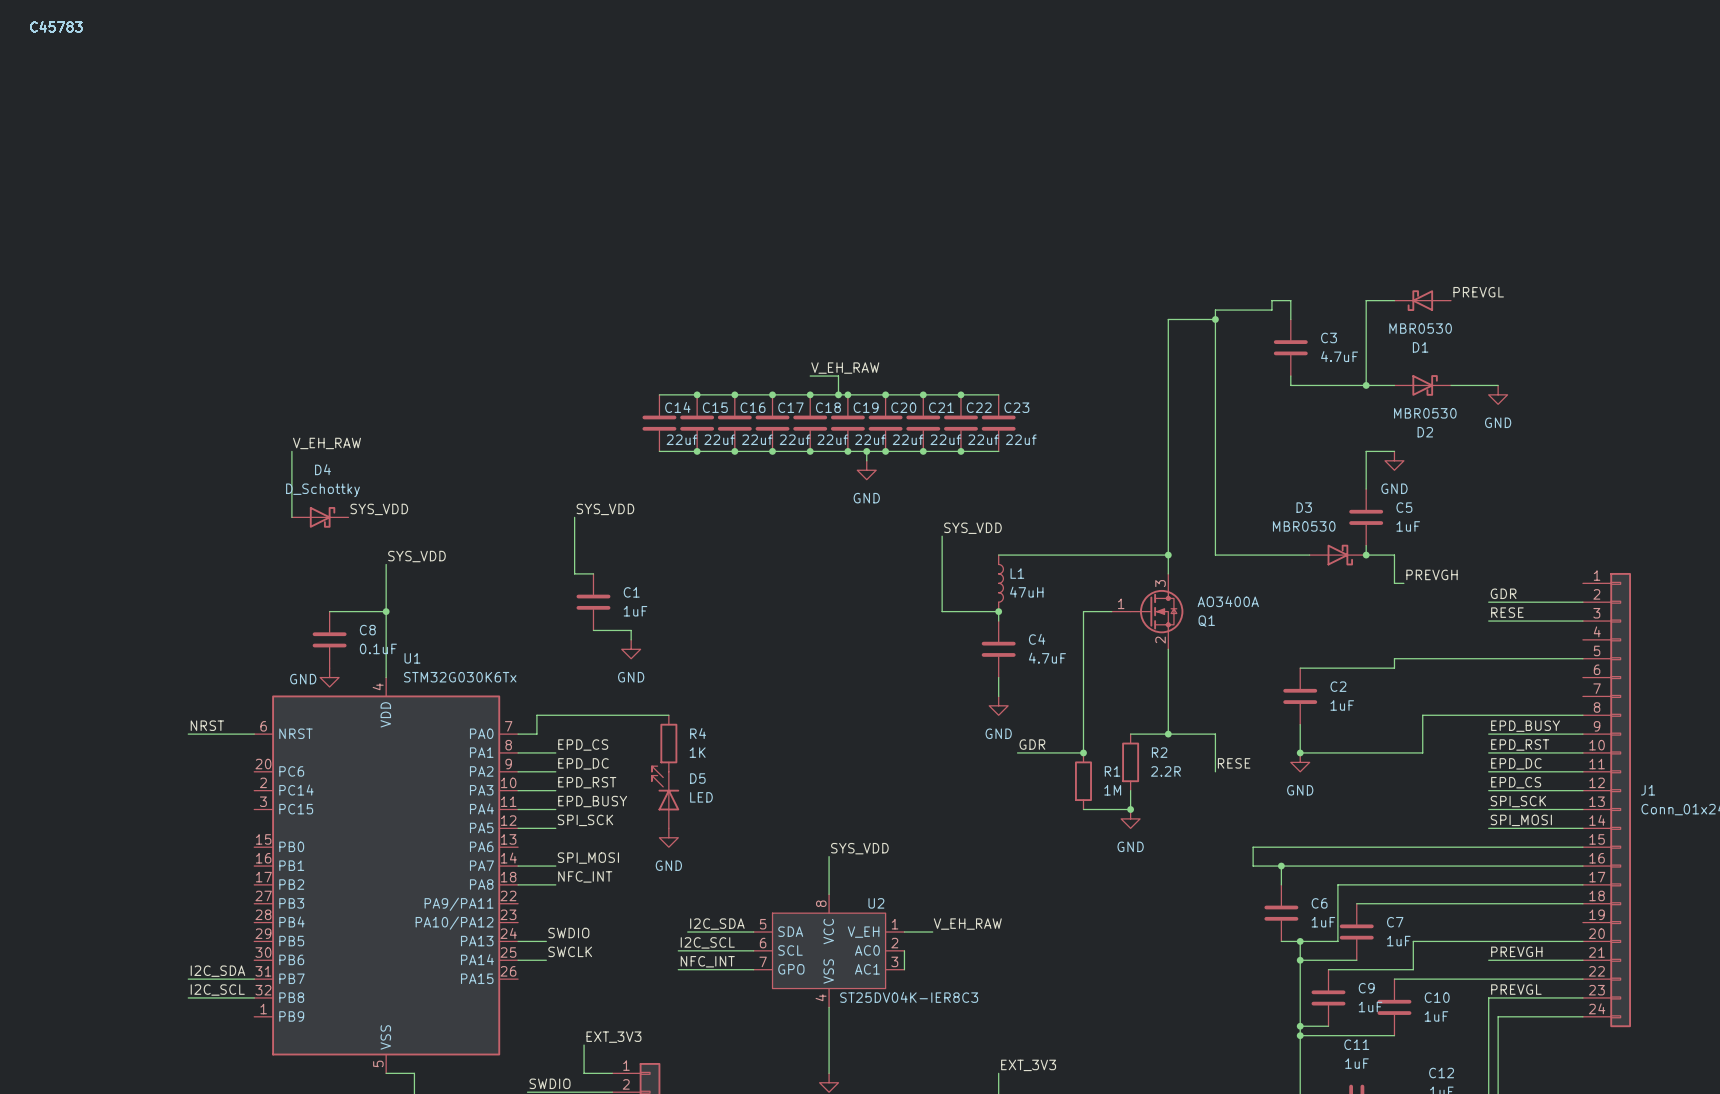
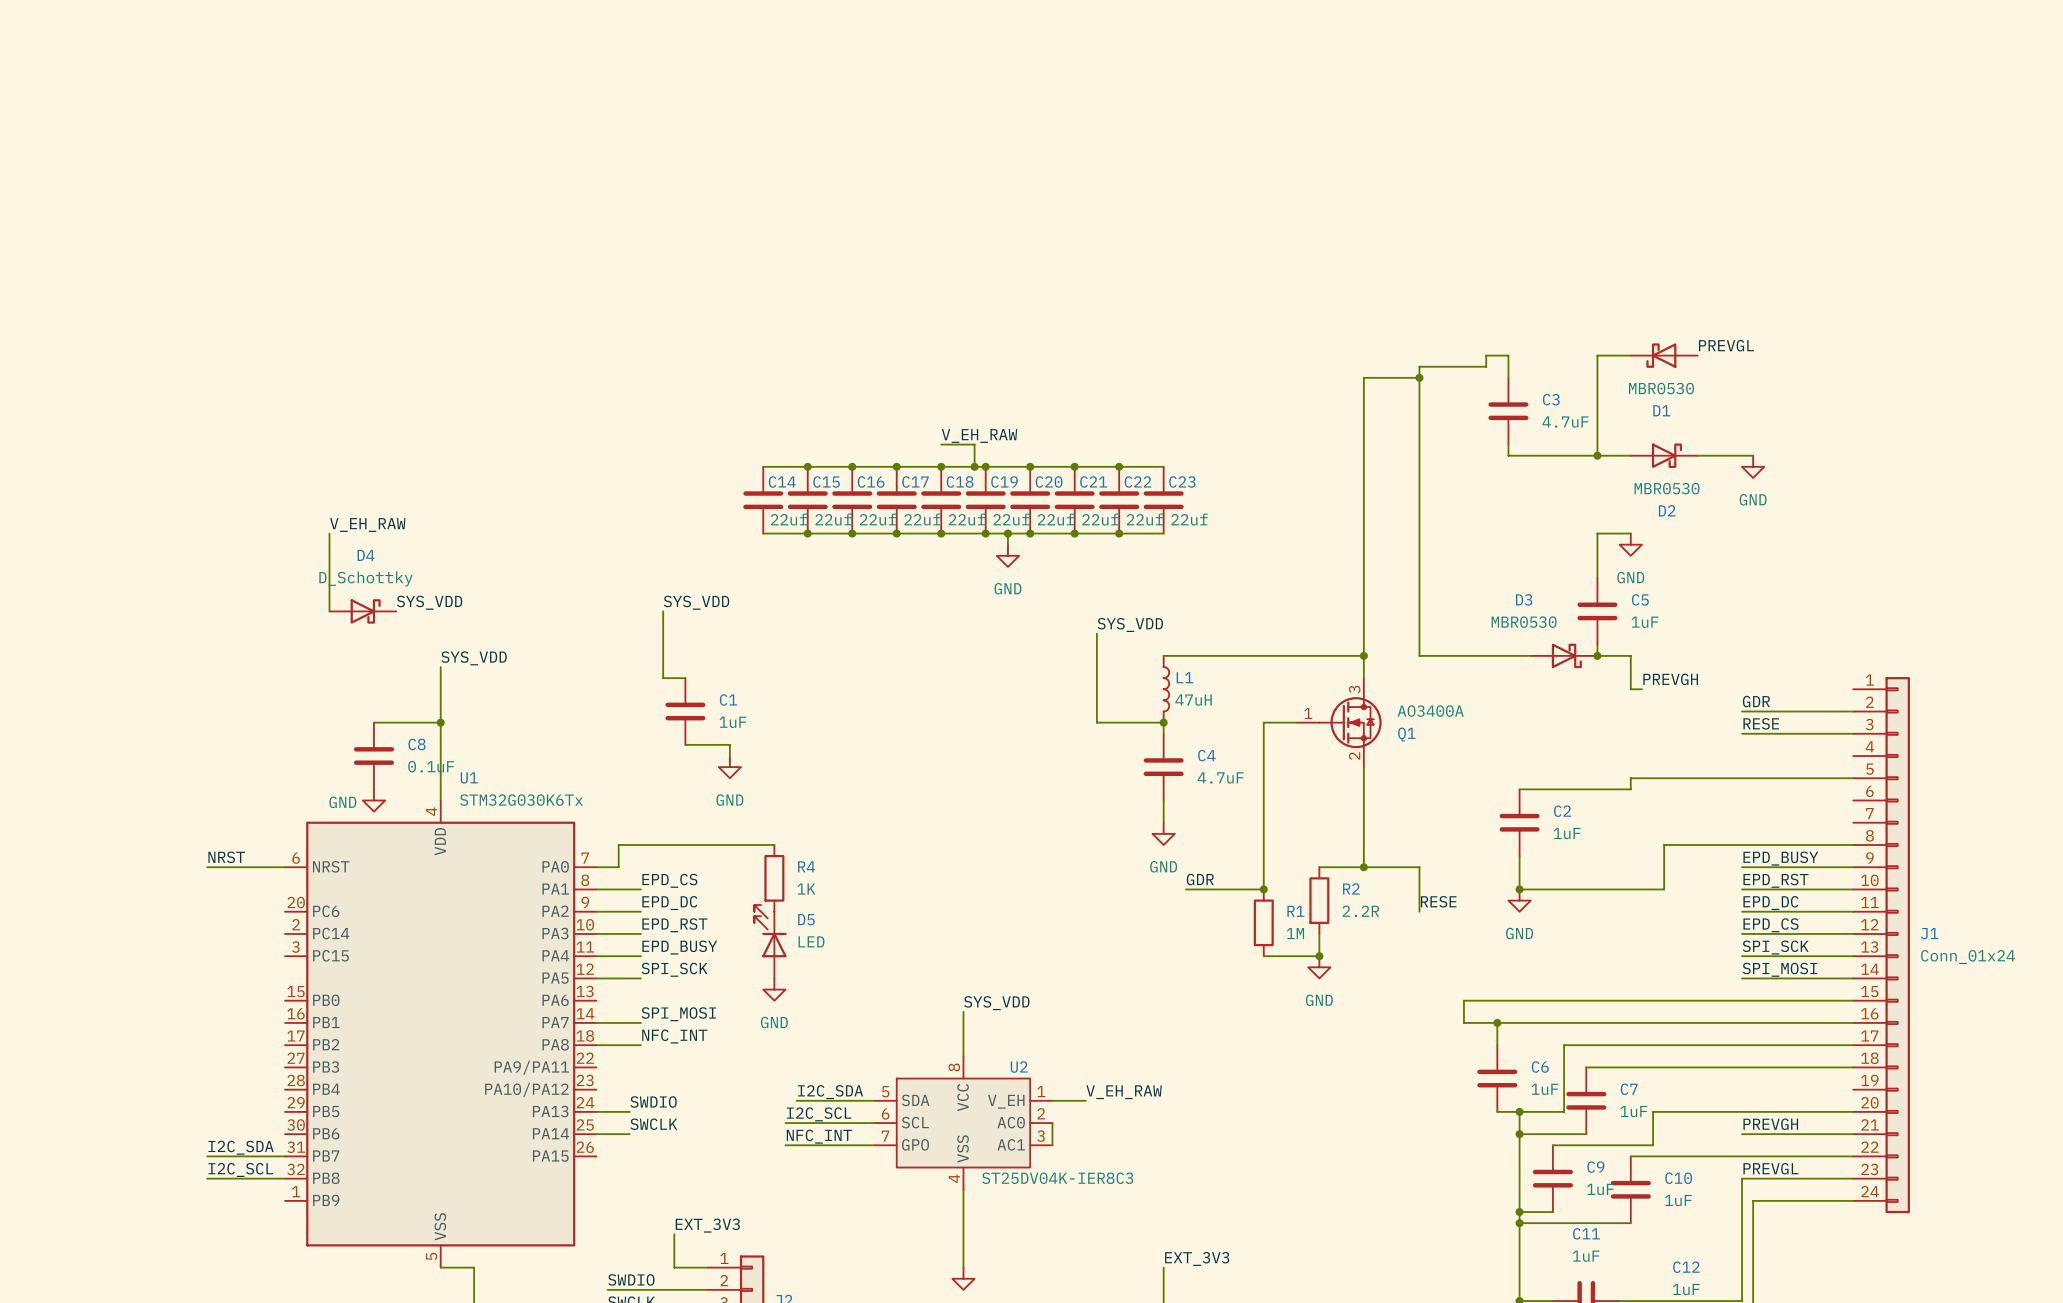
C23 text: C45783 (56, 26) -> none
C21 text: C45783 (56, 26) -> none
C19 text: C45783 (56, 26) -> none
C18 text: C45783 (56, 26) -> none
C15 text: C45783 (56, 26) -> none
C20 text: C45783 (56, 26) -> none
C17 text: C45783 (56, 26) -> none
C22 text: C45783 (56, 26) -> none
C16 text: C45783 (56, 26) -> none

